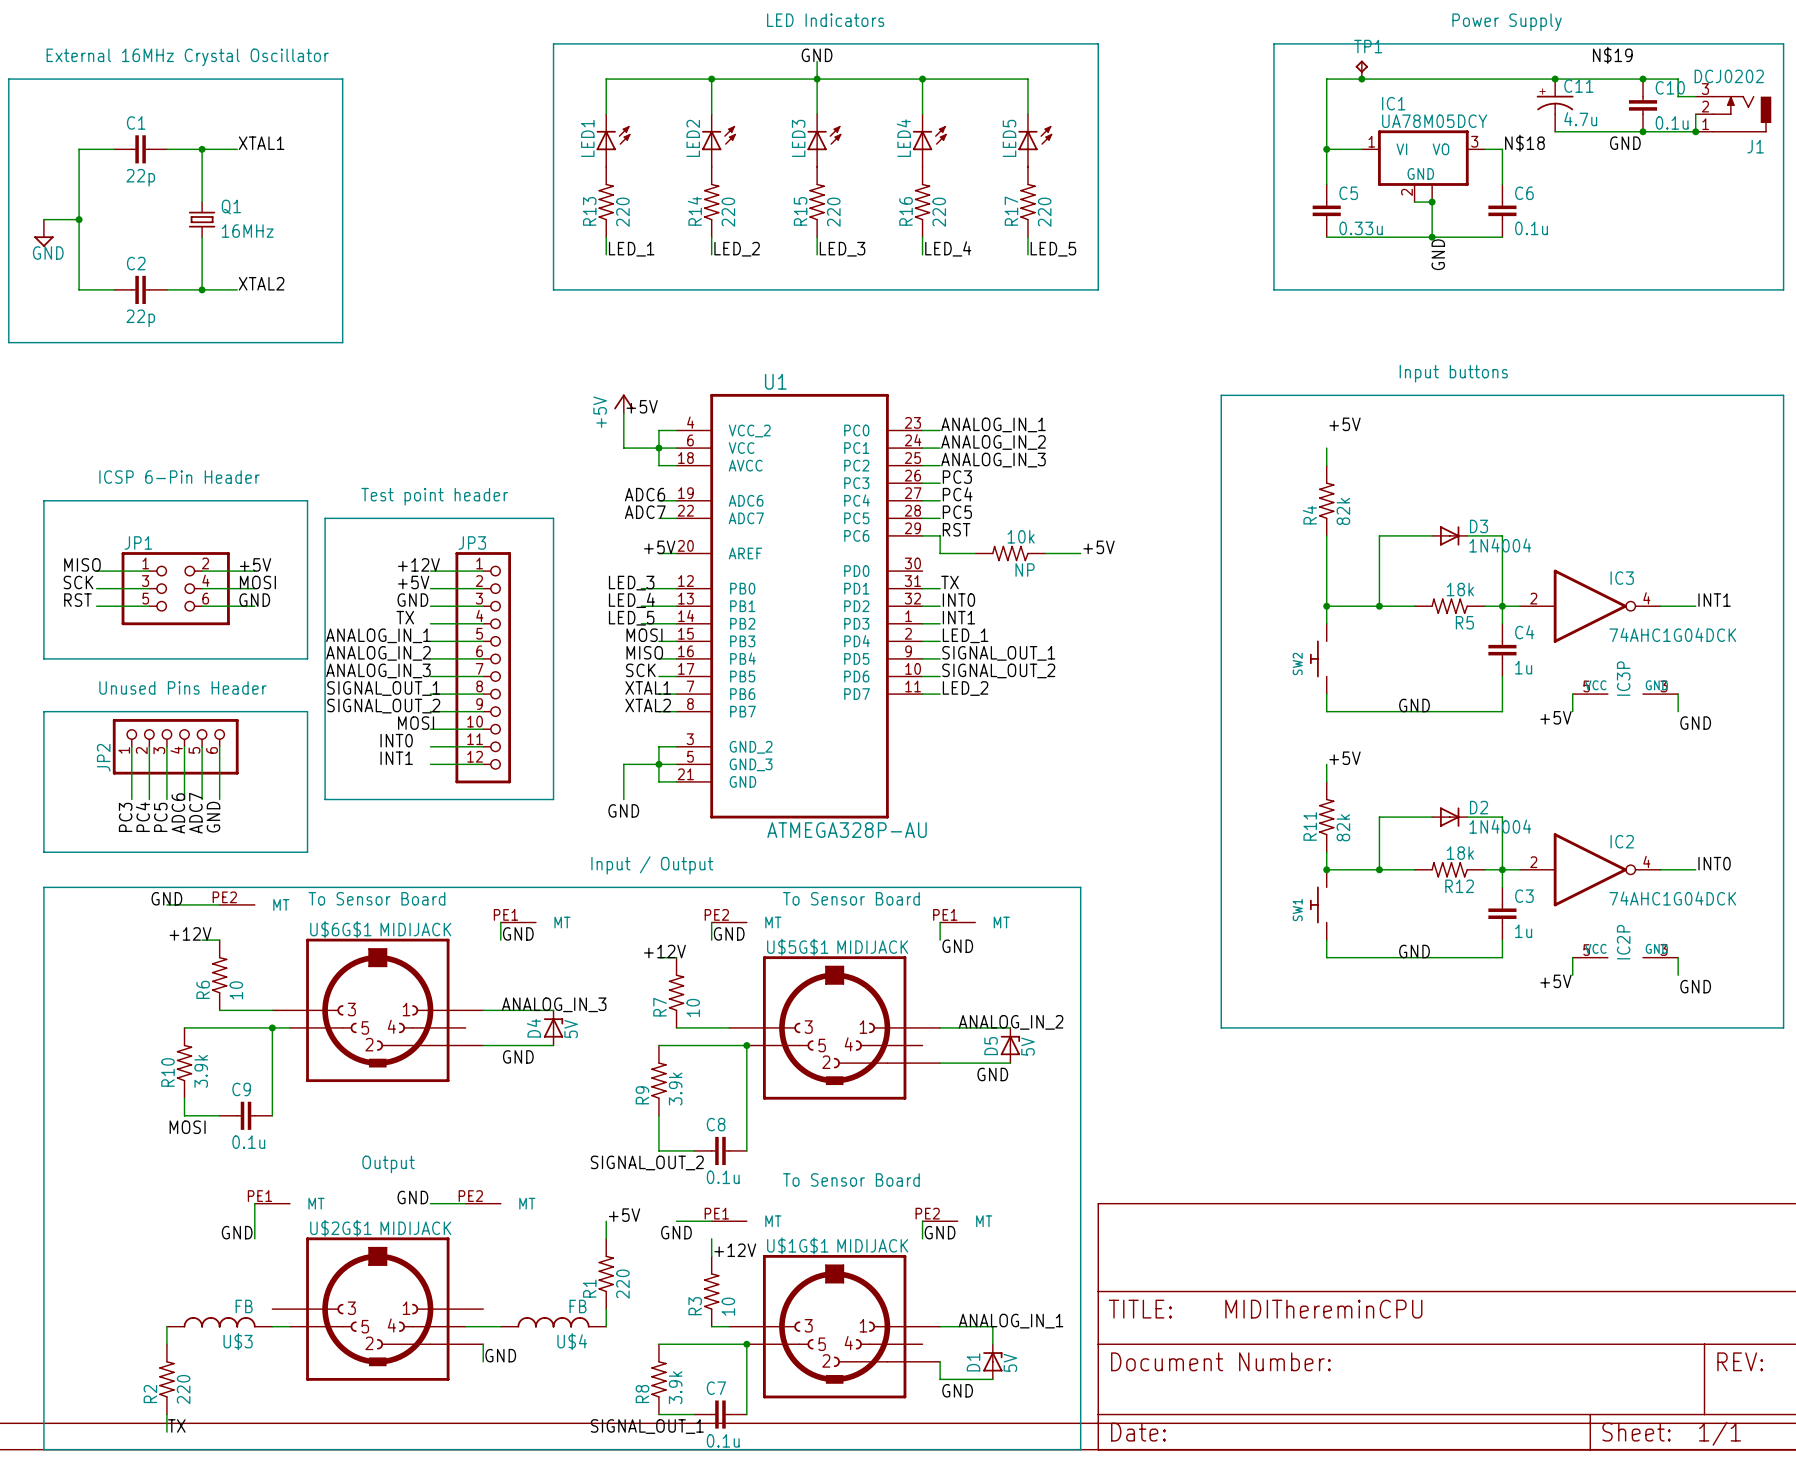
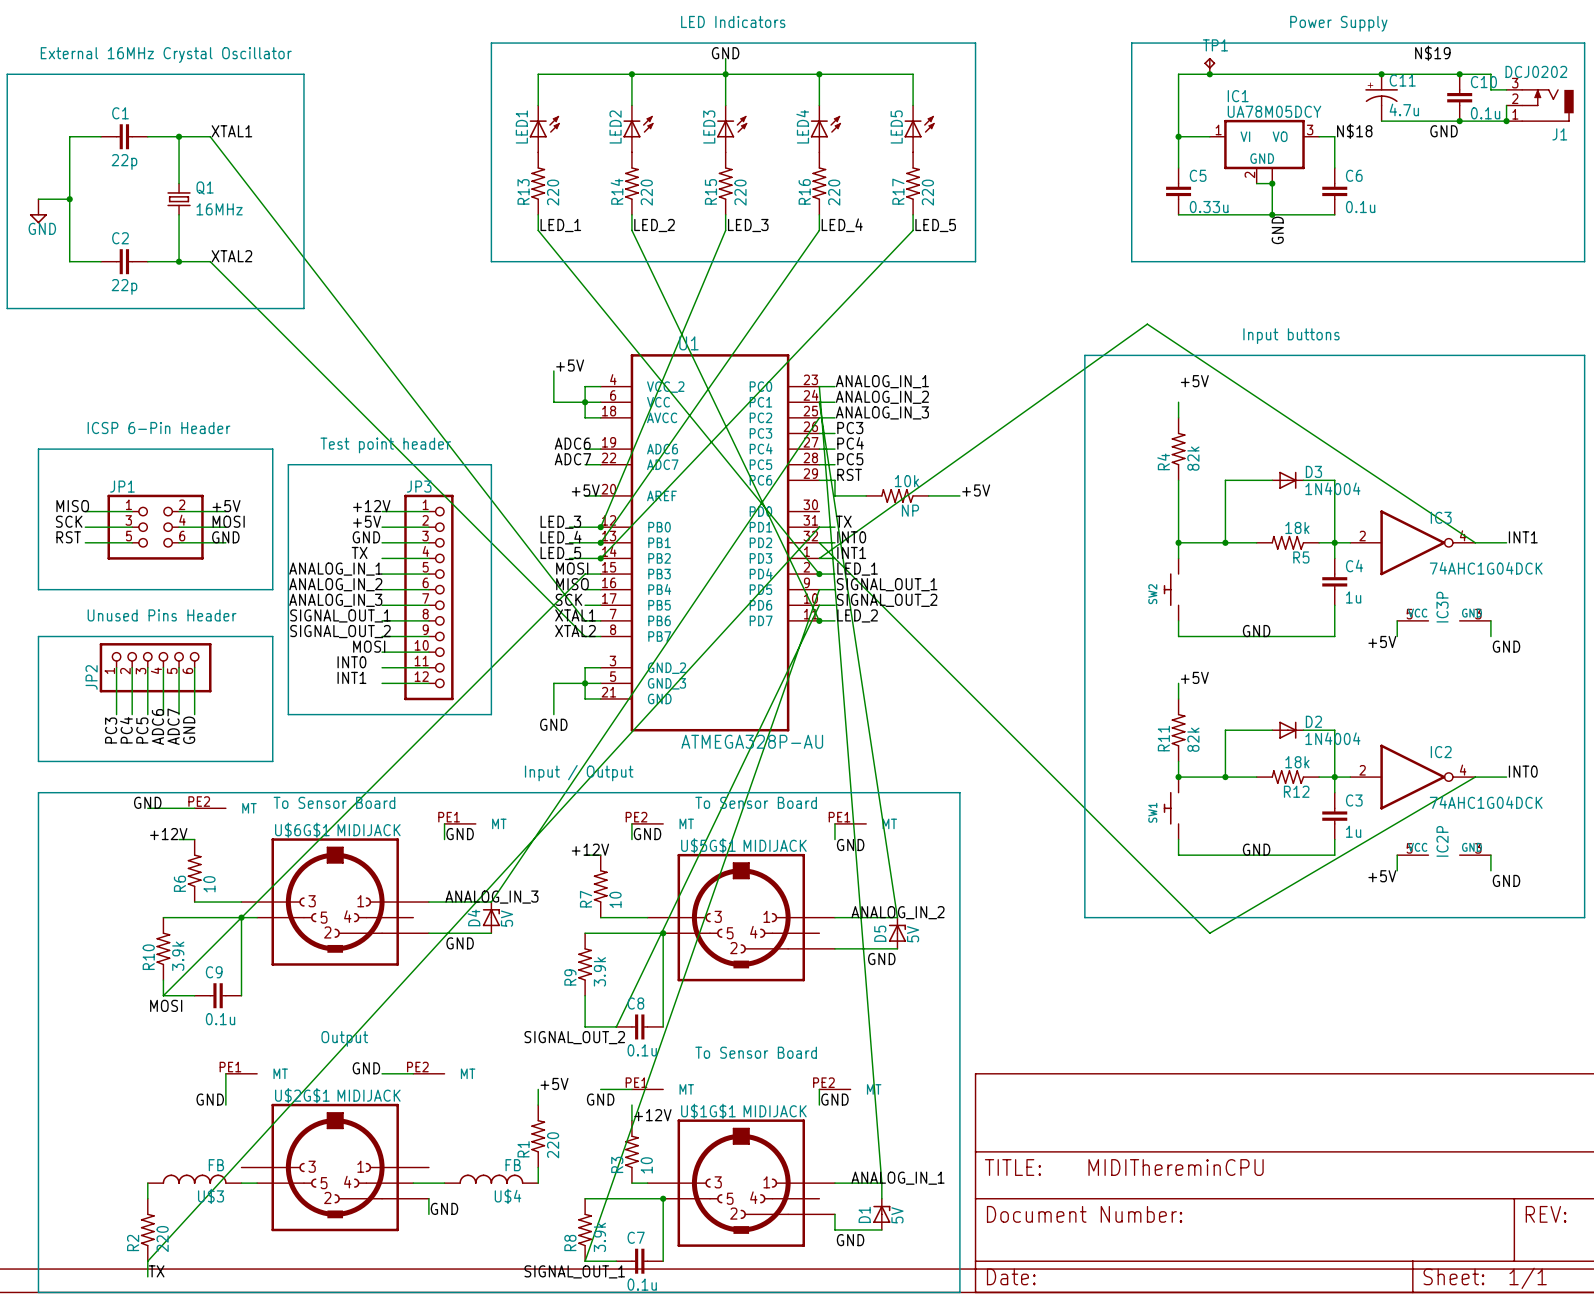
wire: none -> (210, 136) (585, 620)
wire: none -> (538, 230) (819, 574)
wire: none -> (631, 230) (819, 620)
wire: none -> (725, 230) (600, 527)
wire: none -> (819, 230) (600, 542)
wire: none -> (913, 230) (600, 558)
wire: none -> (210, 261) (585, 636)
power symbol: +5V (623, 403) -> none
wire: none -> (819, 386) (881, 1183)
wire: none -> (819, 402) (897, 917)
wire: none -> (819, 417) (491, 902)
junction: none -> (600, 527)
wire: none -> (819, 527) (147, 1261)
junction: none -> (600, 542)
wire: none -> (819, 542) (1209, 933) (1475, 777)
wire: none -> (1475, 542) (1147, 324) (819, 558)
junction: none -> (600, 558)
wire: none -> (585, 574) (163, 995)
junction: none -> (819, 574)
wire: none -> (819, 589) (585, 1261)
wire: none -> (819, 605) (616, 1026)
junction: none -> (819, 620)

